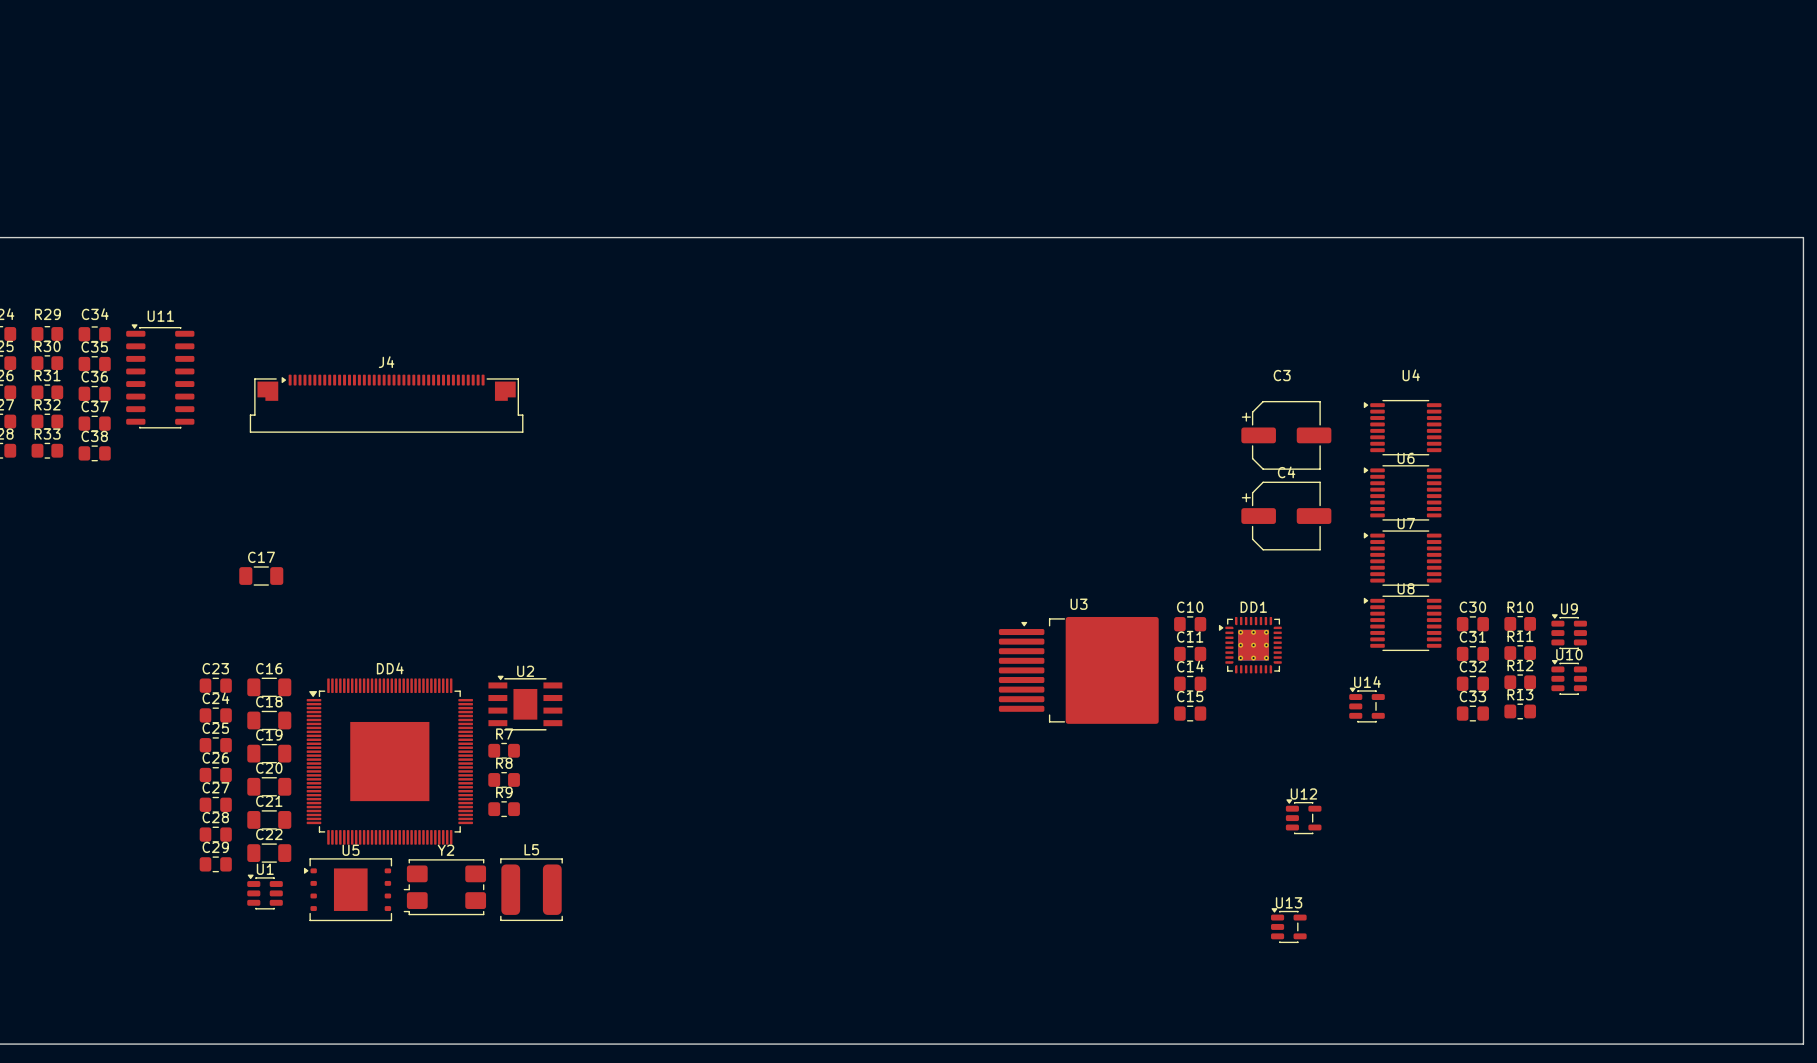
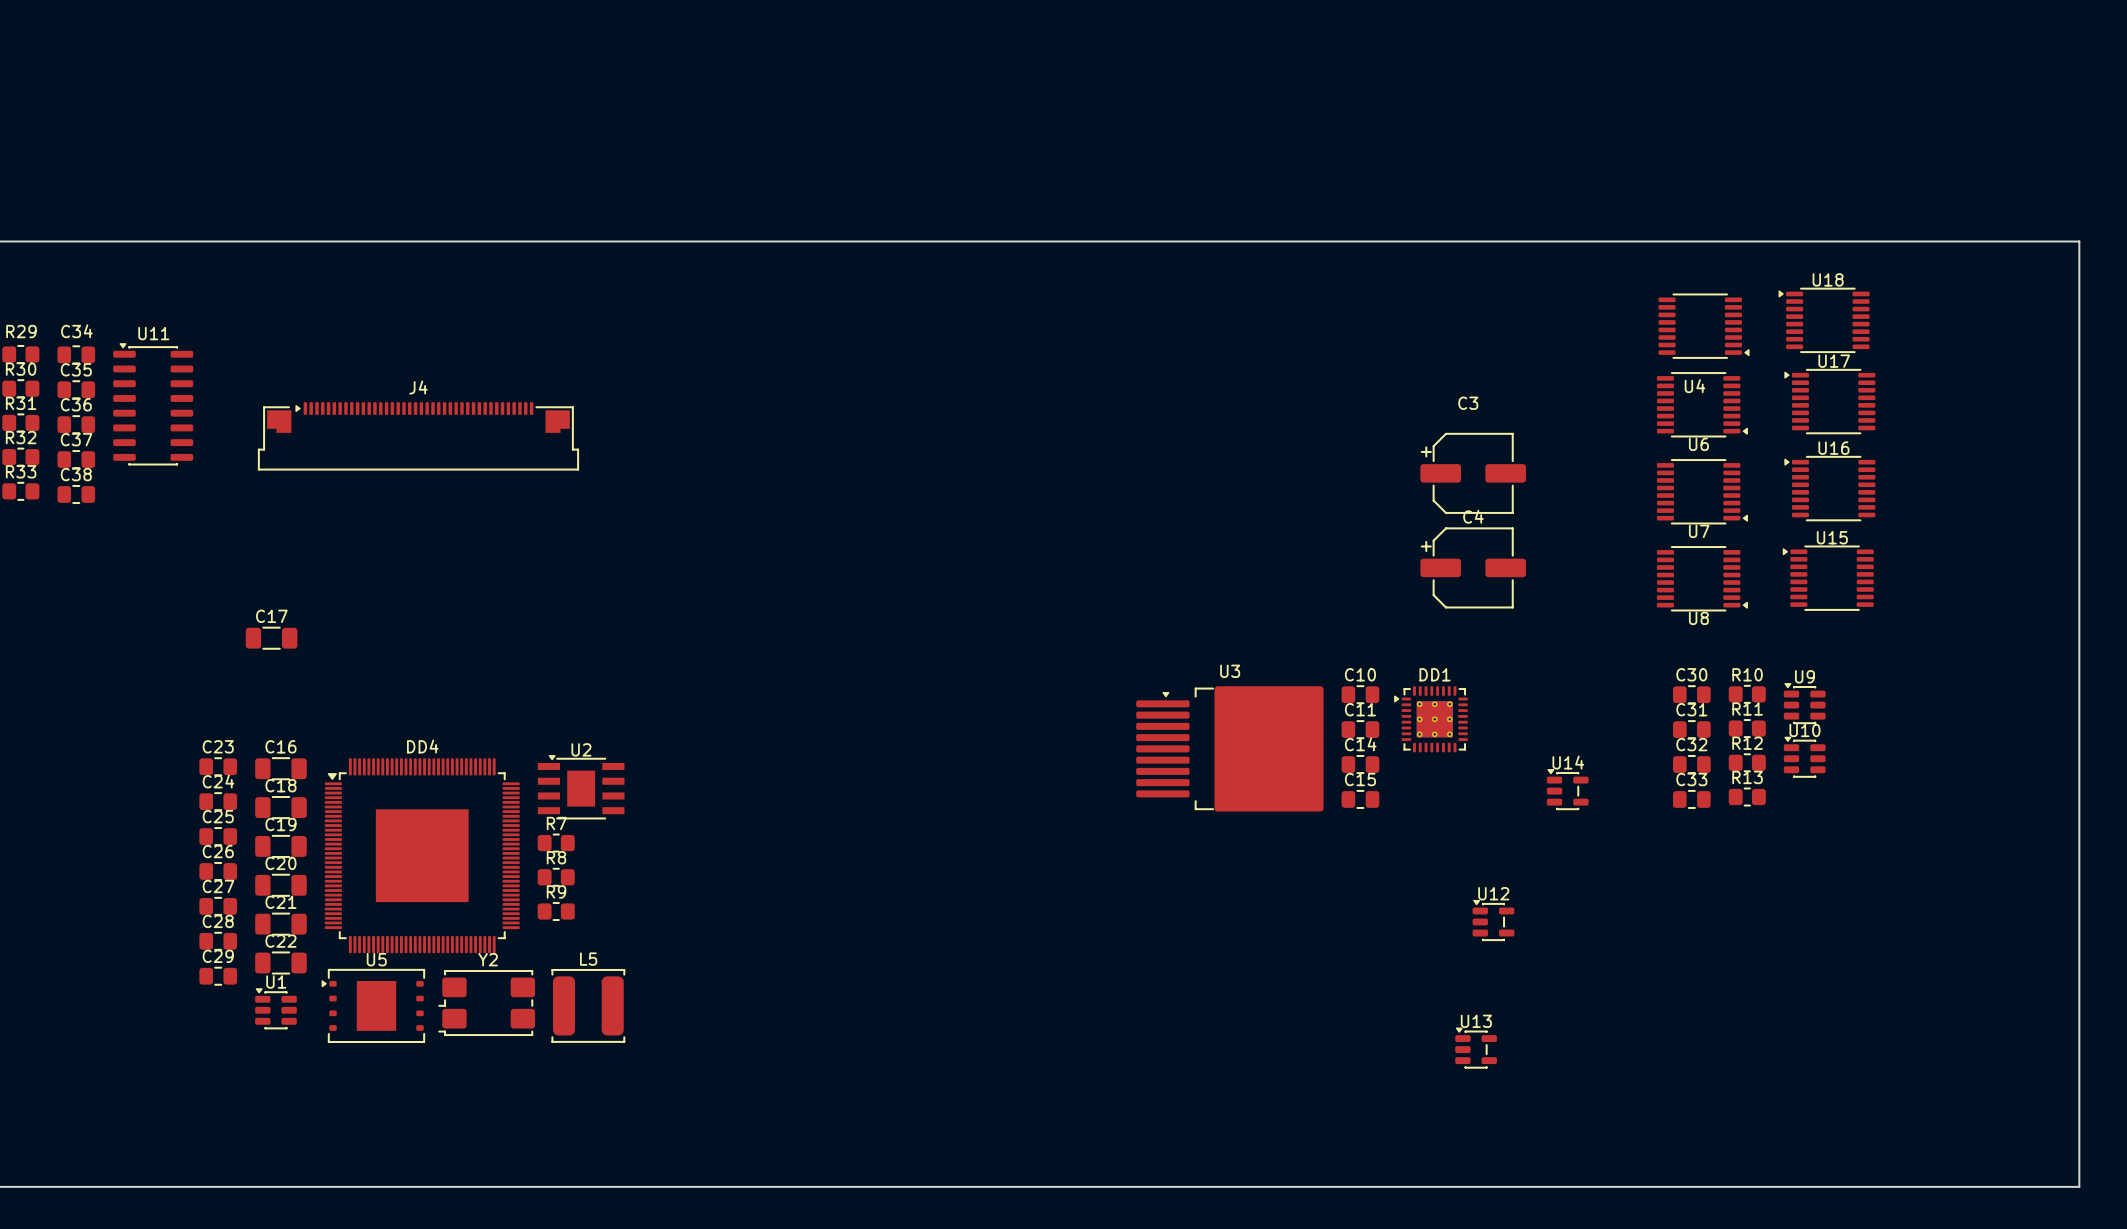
U18: none -> (1824, 320)
U17: none -> (1829, 401)
U4 rotation: 0° (1402, 427) -> 180° (1704, 326)
U4 position: (1402, 427) -> (1704, 326)
U16: none -> (1829, 488)
U6 rotation: 0° (1402, 492) -> 180° (1702, 404)
U6 position: (1402, 492) -> (1702, 404)
U15: none -> (1828, 578)
U7 rotation: 0° (1402, 558) -> 180° (1702, 491)
U7 position: (1402, 558) -> (1702, 491)
U8 rotation: 0° (1402, 623) -> 180° (1702, 578)
U8 position: (1402, 623) -> (1702, 578)

